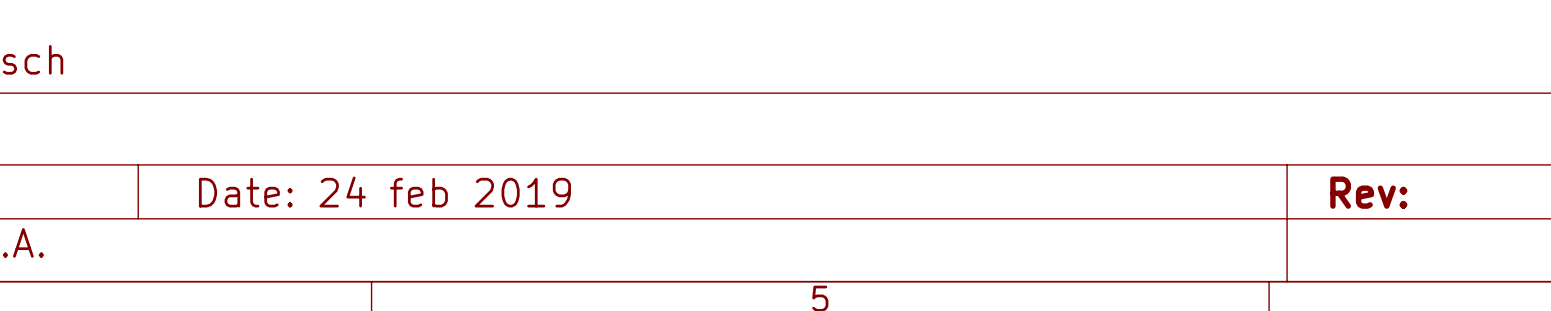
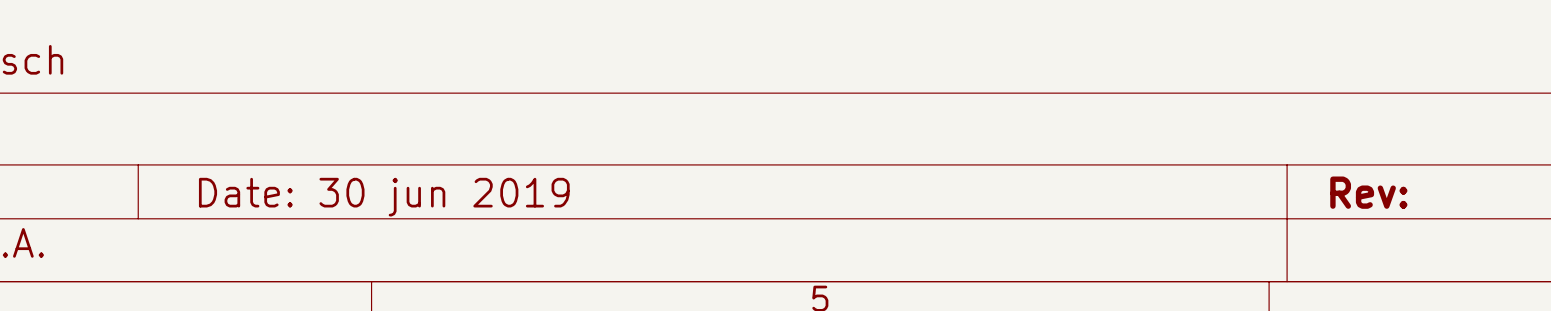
title block: Date: 24 feb 2019 (384, 192) -> Date: 30 jun 2019 (384, 197)

